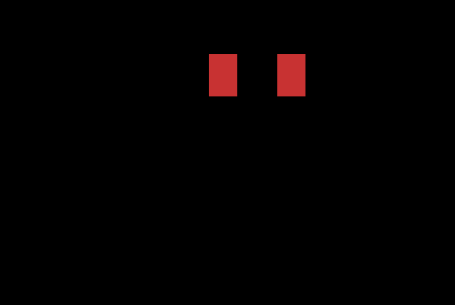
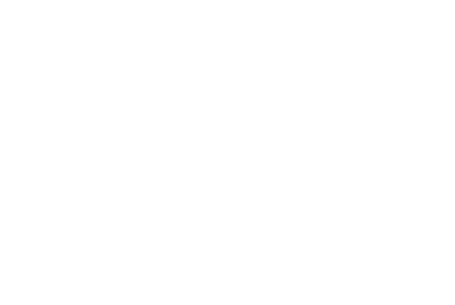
part: (257, 75) -> none

